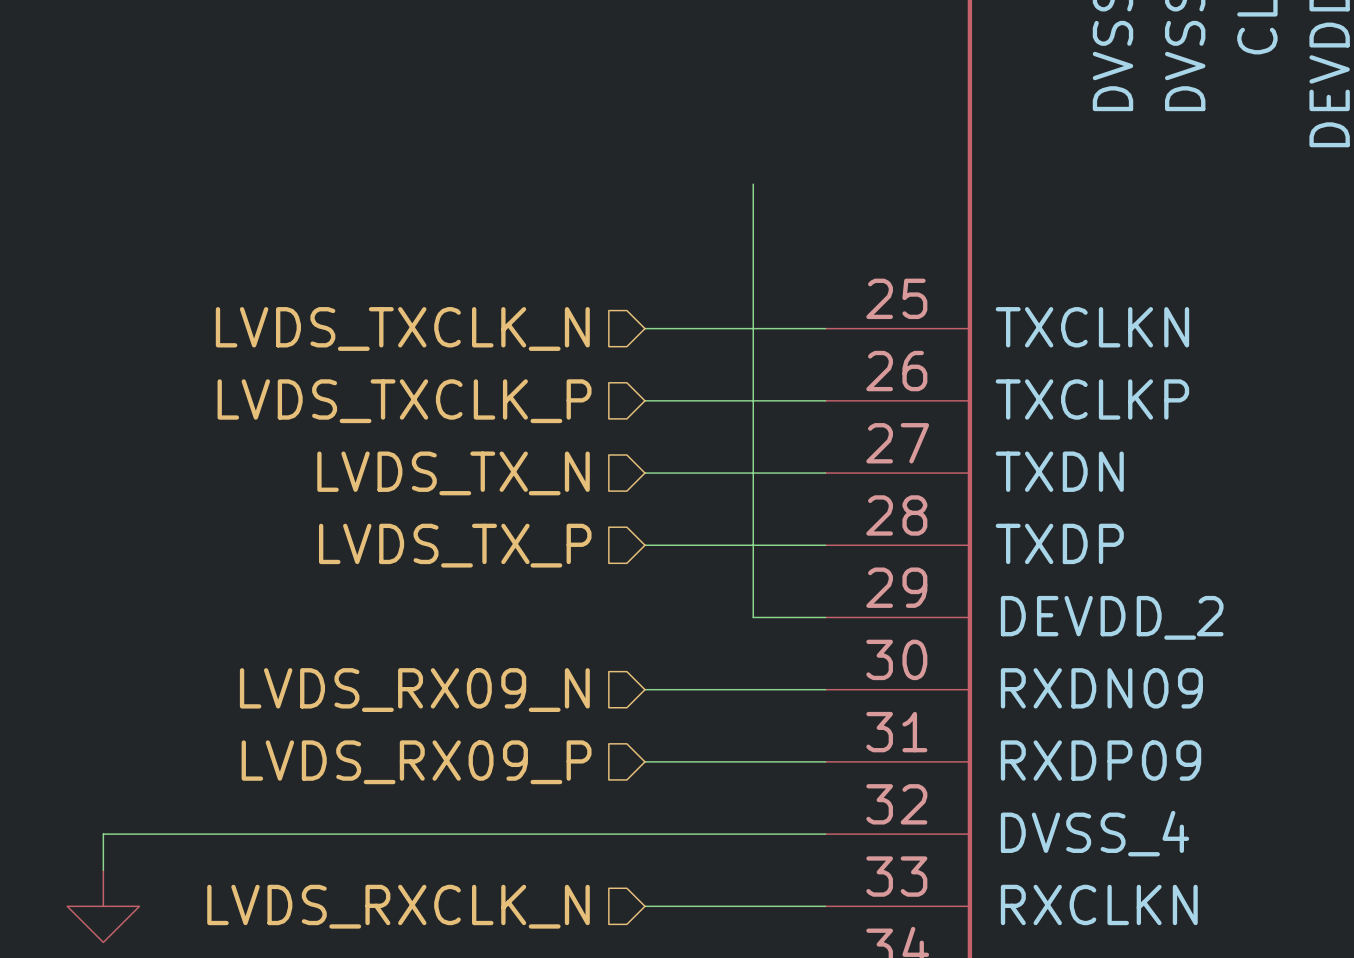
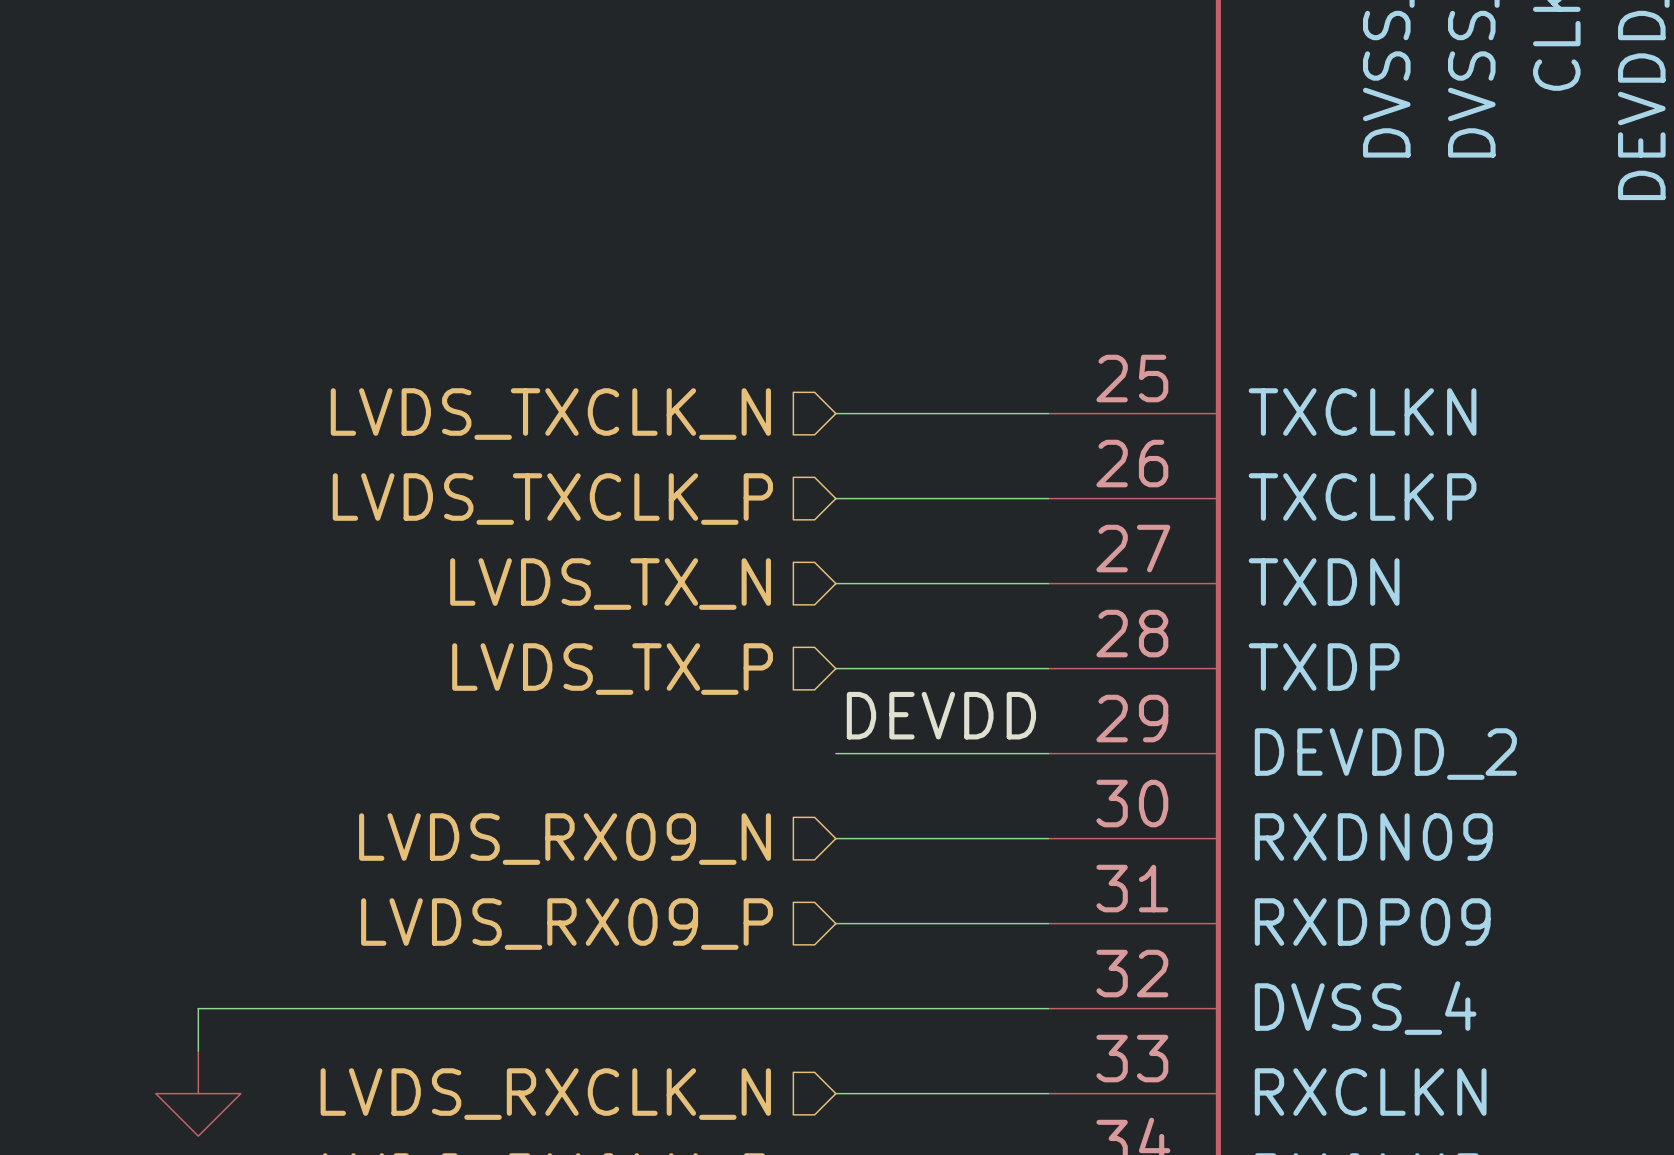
wire: (753, 184) (753, 617) -> (835, 753) (963, 753)
label: none -> DEVDD (941, 715)

